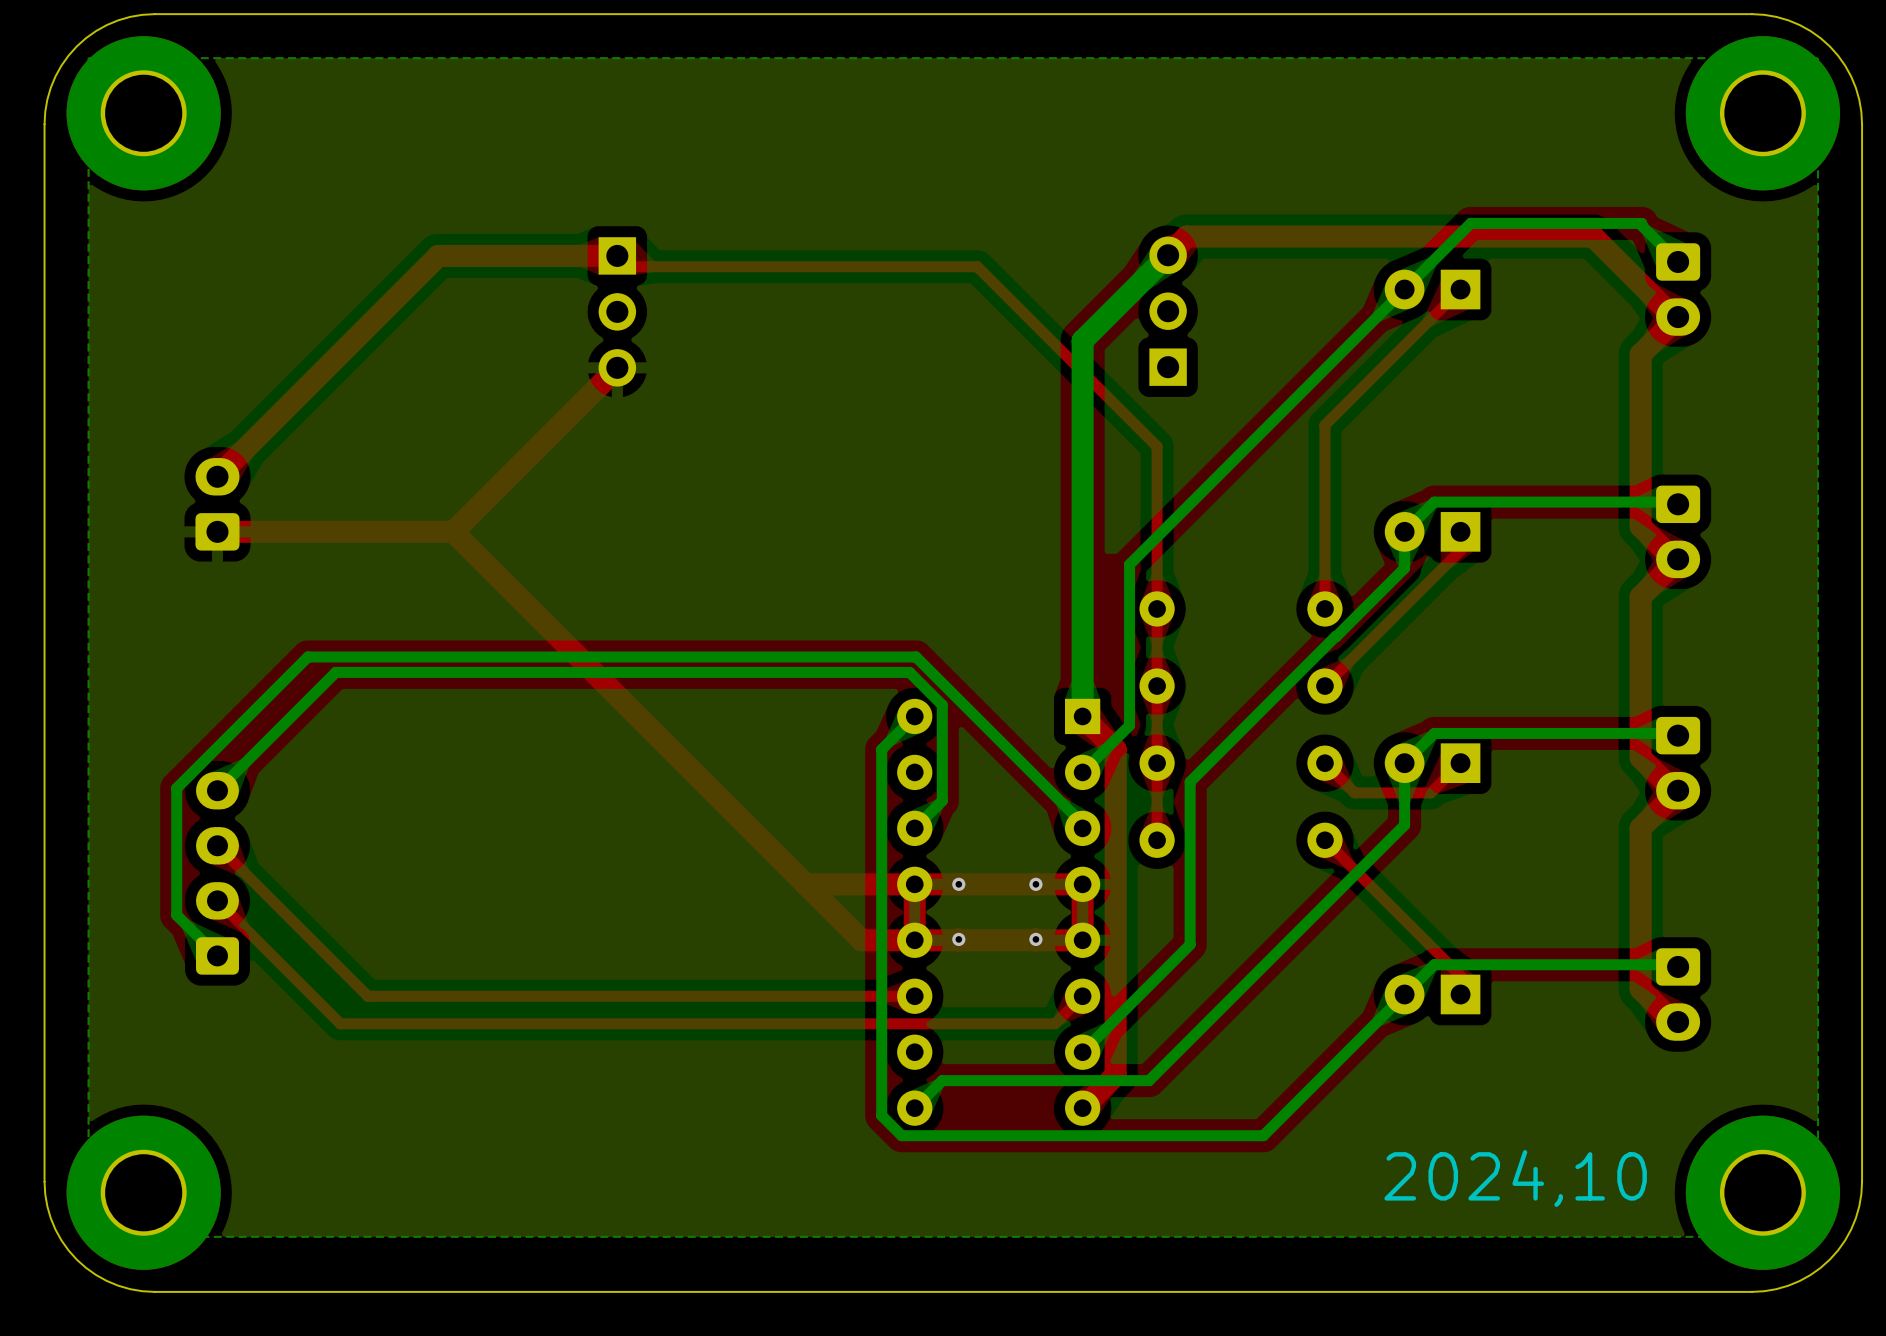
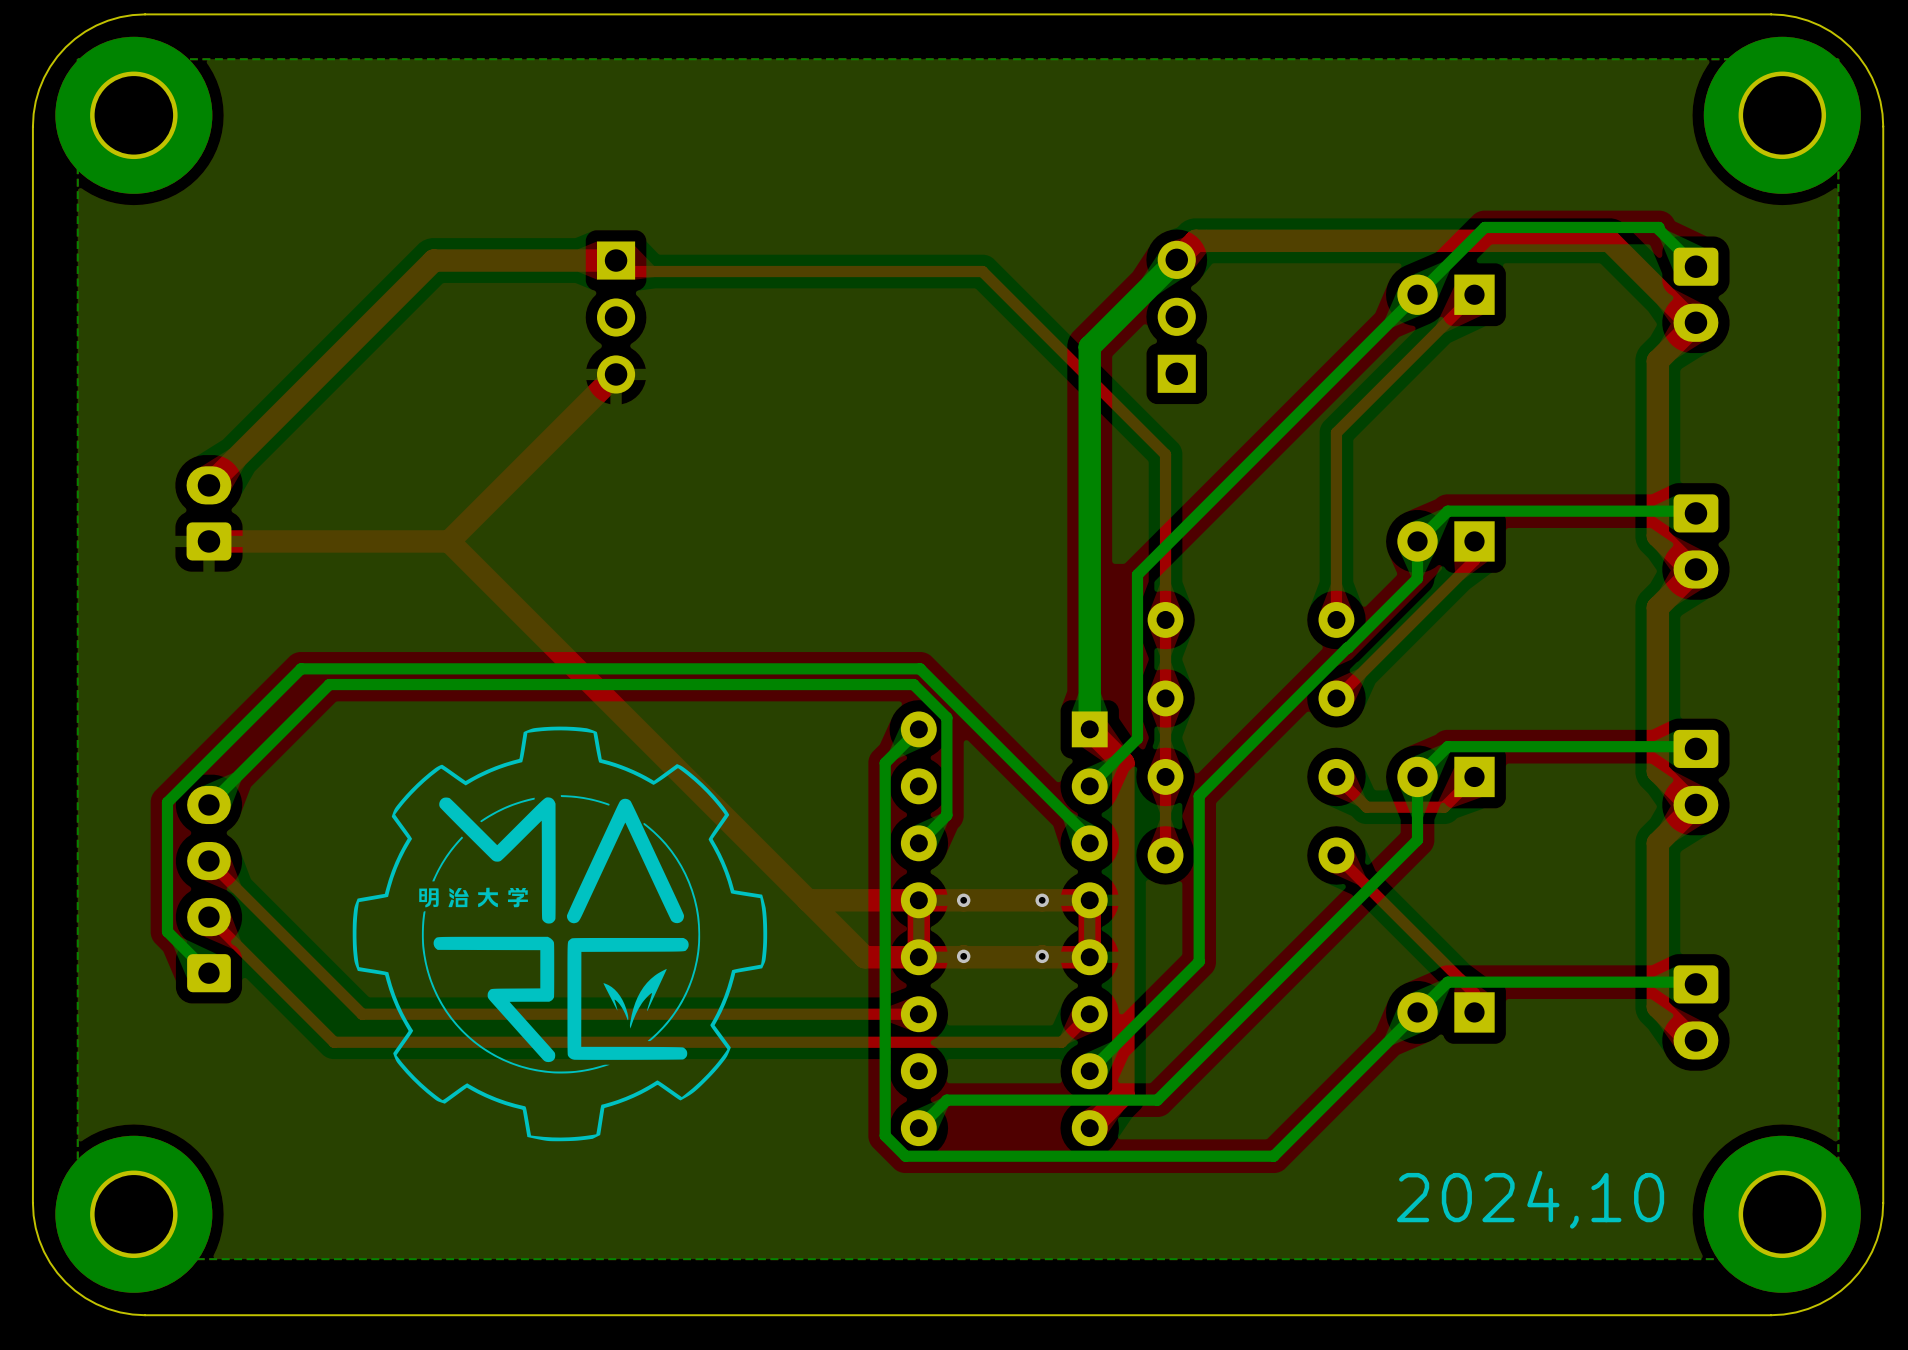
drawing: none -> [352, 726, 768, 1142]

